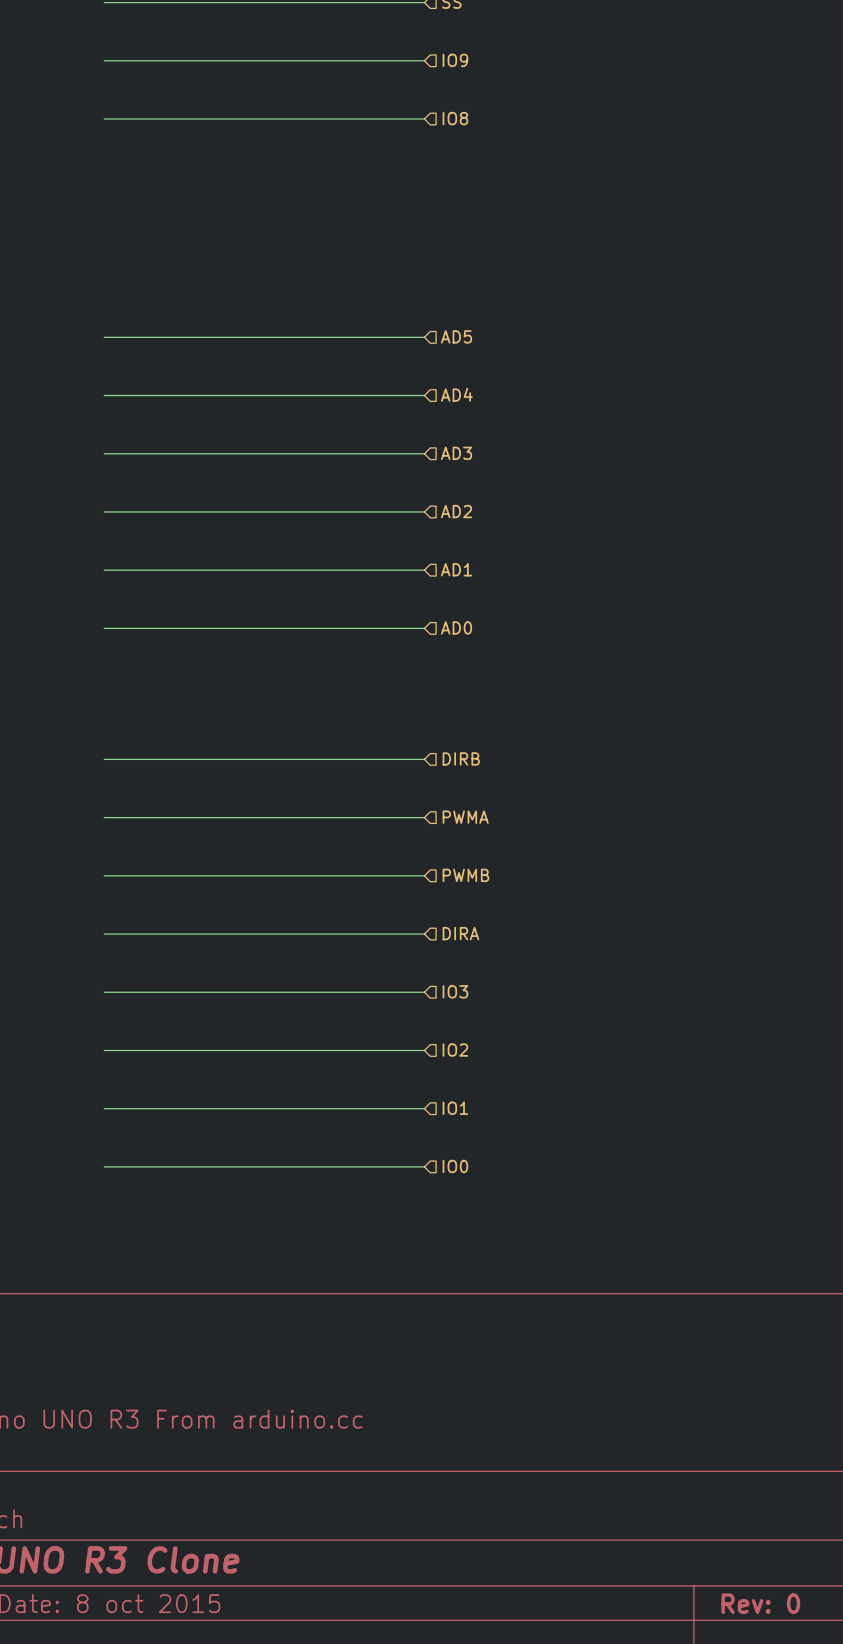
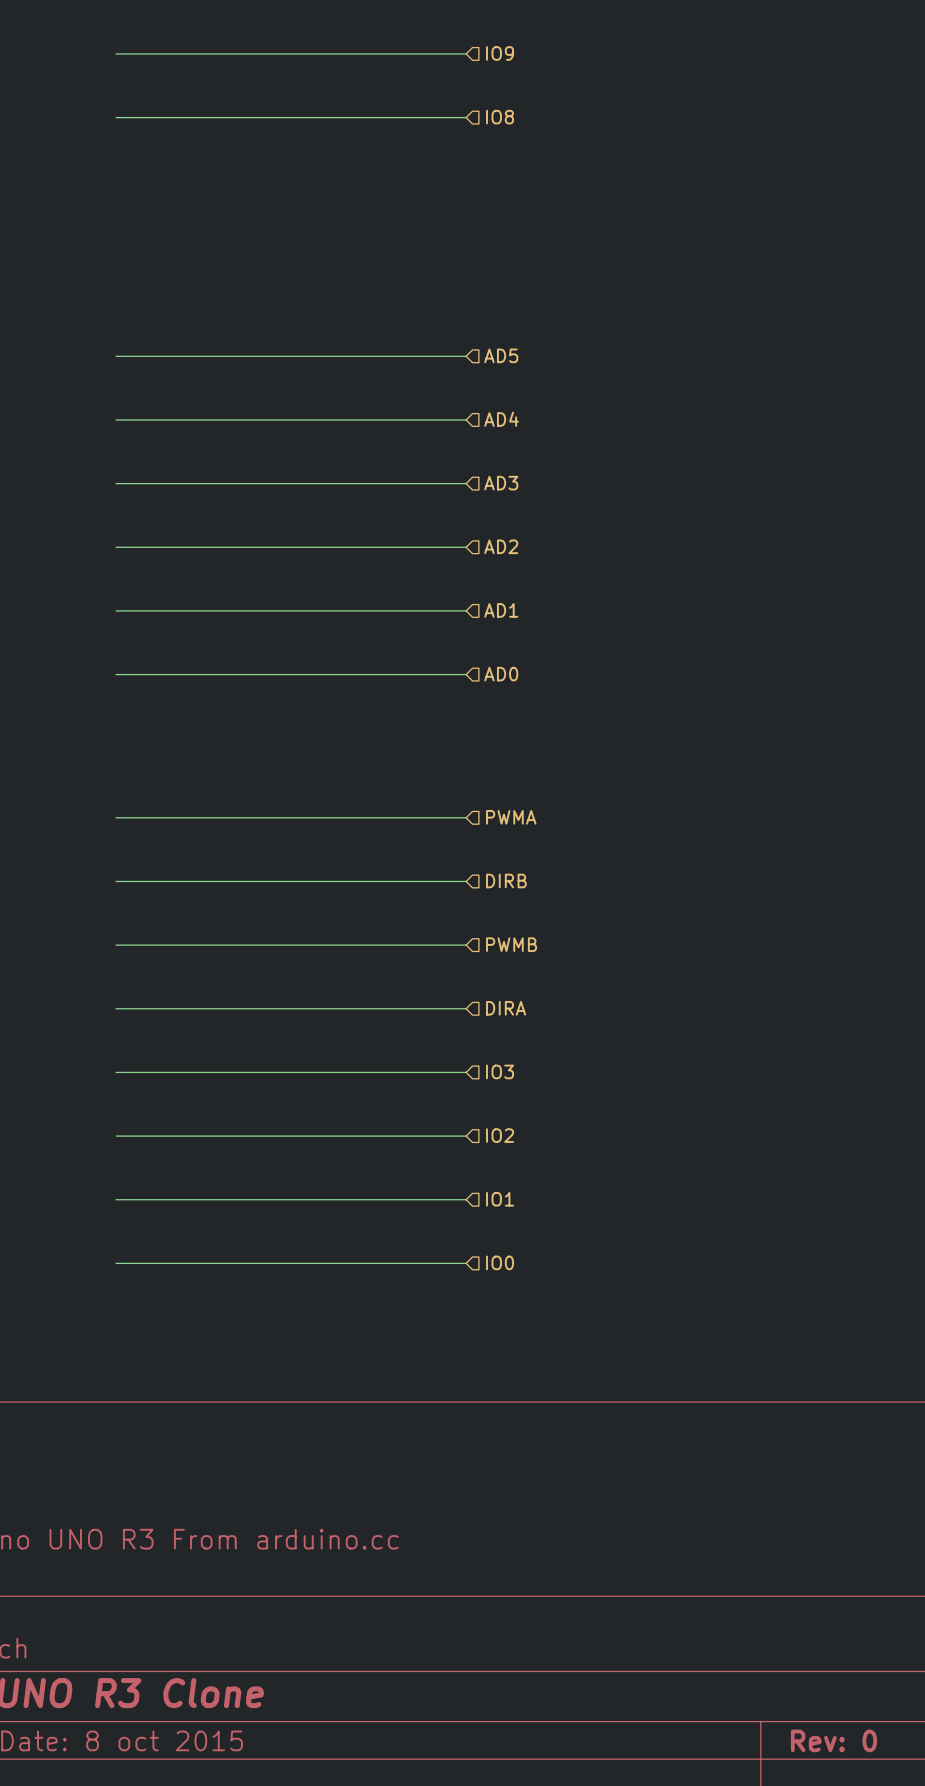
hierarchical label: DIRB (461, 758) -> PWMA (511, 817)
hierarchical label: PWMA (465, 817) -> DIRB (506, 880)

